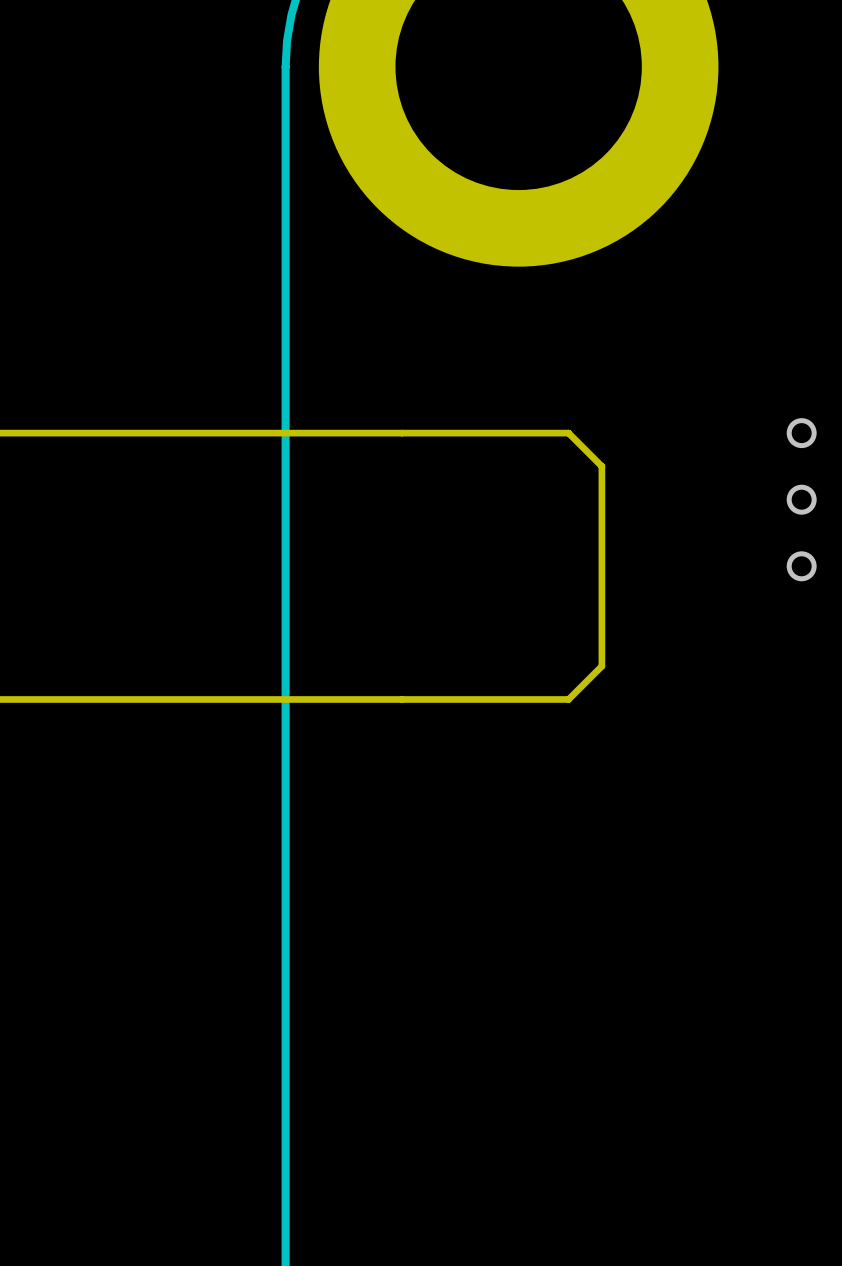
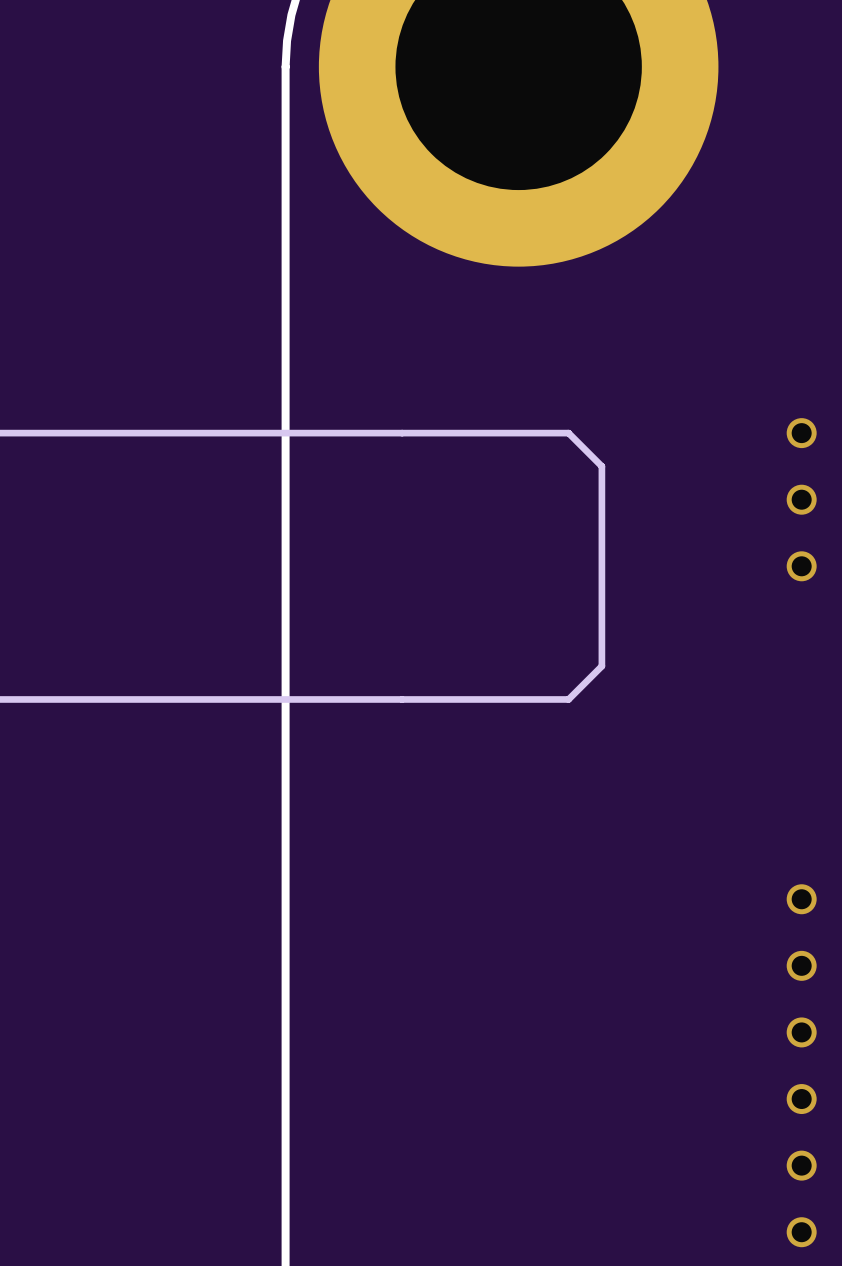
via: none -> (801, 899)
via: none -> (801, 965)
via: none -> (801, 1032)
via: none -> (801, 1099)
via: none -> (801, 1165)
via: none -> (801, 1232)

